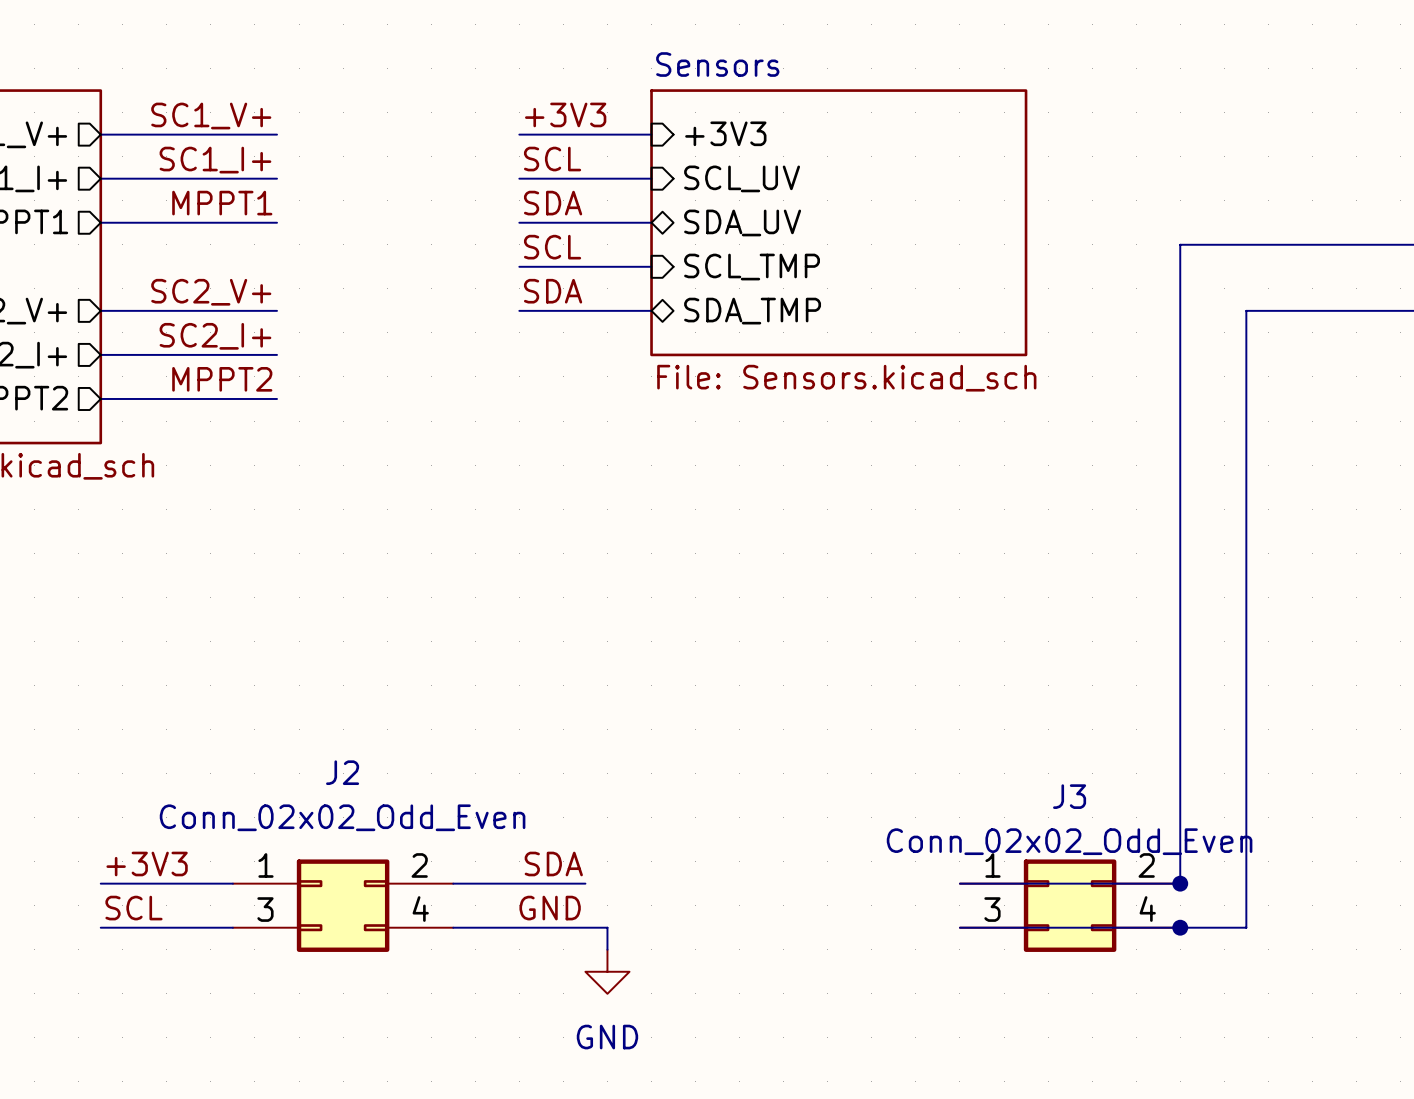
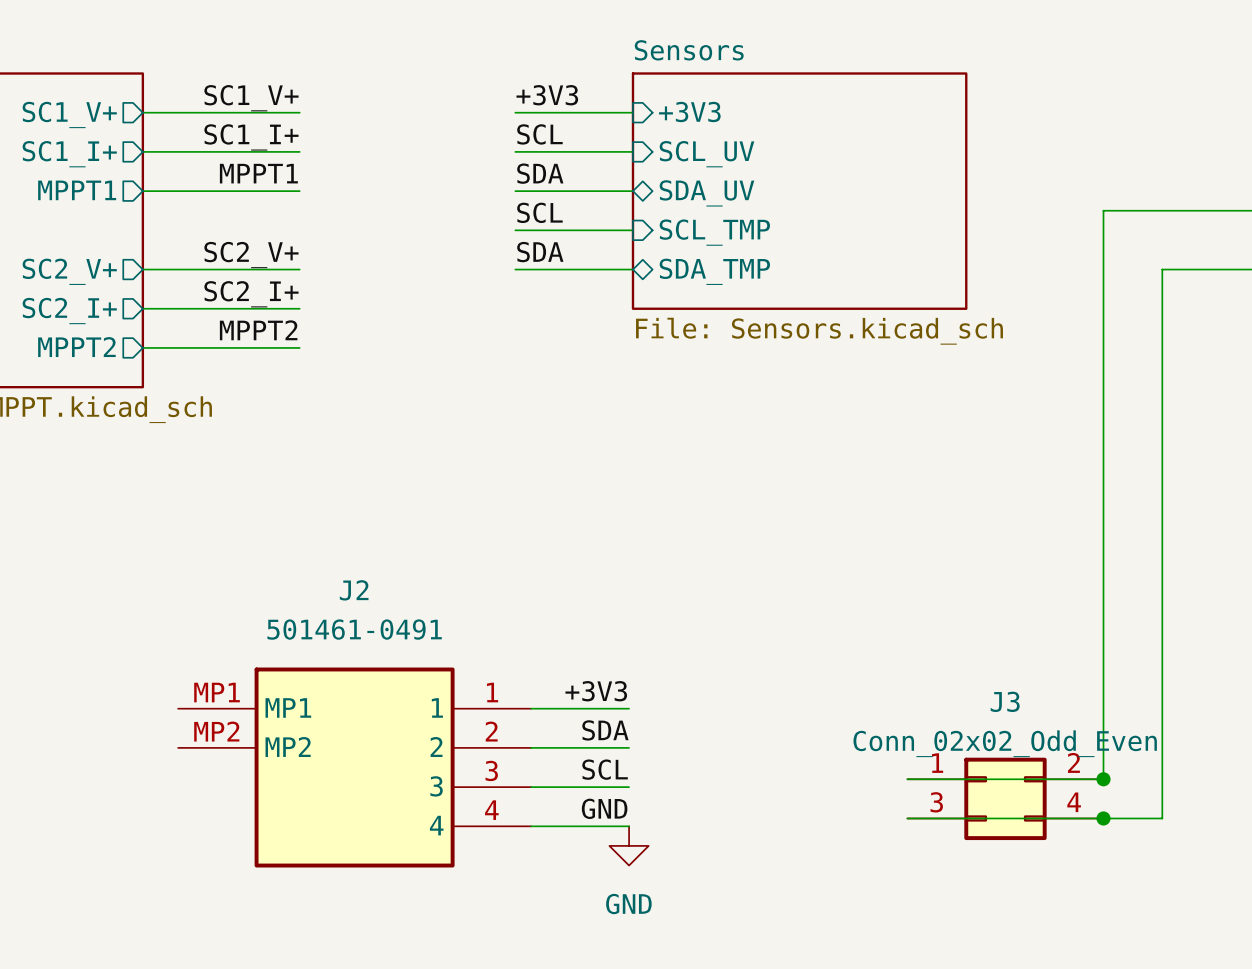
label: none -> +3V3 (596, 691)
wire: none -> (531, 708) (629, 708)
wire: none -> (531, 747) (629, 747)
label: +3V3 (147, 863) -> none
label position: SDA (553, 863) -> SDA (605, 730)
part: none -> (354, 767)
label: none -> SCL (605, 769)
wire: (100, 883) (232, 883) -> none
wire: (453, 883) (585, 883) -> none
wire: none -> (531, 787) (629, 787)
J2: Conn_02x02_Odd_Even (343, 905) -> none
label: SCL (133, 908) -> none
label position: GND (550, 908) -> GND (604, 808)
wire: (100, 927) (232, 927) -> none
wire: (453, 927) (607, 927) (607, 949) -> none
wire: none -> (531, 826) (629, 826)
power symbol position: GND (607, 971) -> GND (629, 845)

